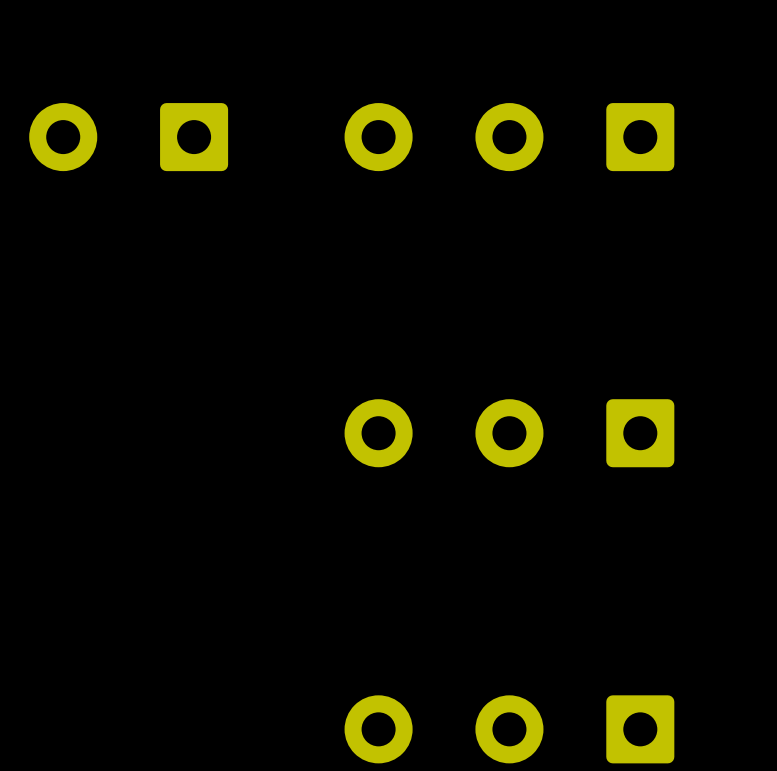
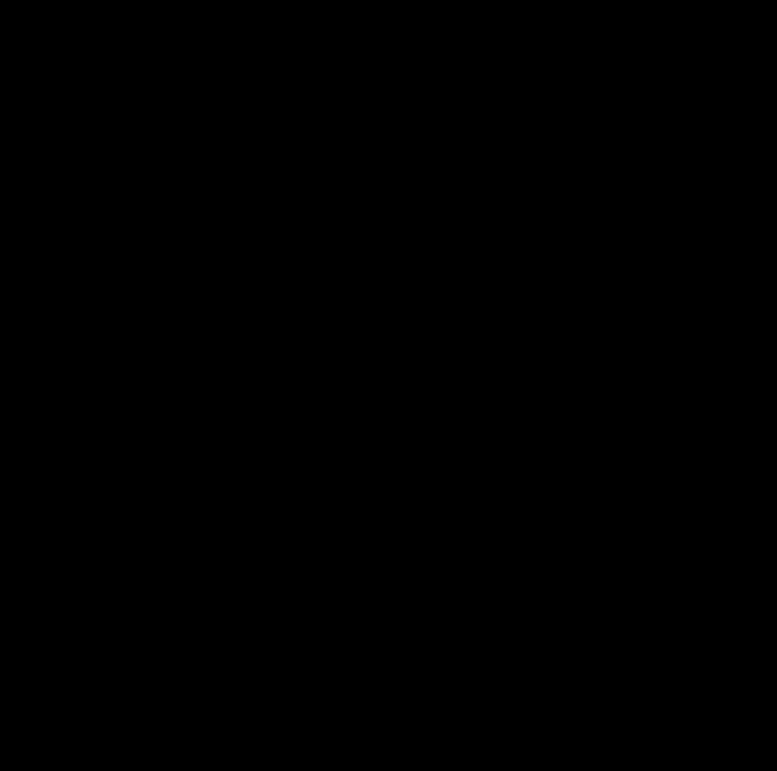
part: (128, 137) -> none
part: (509, 137) -> none
part: (509, 433) -> none
part: (509, 729) -> none

